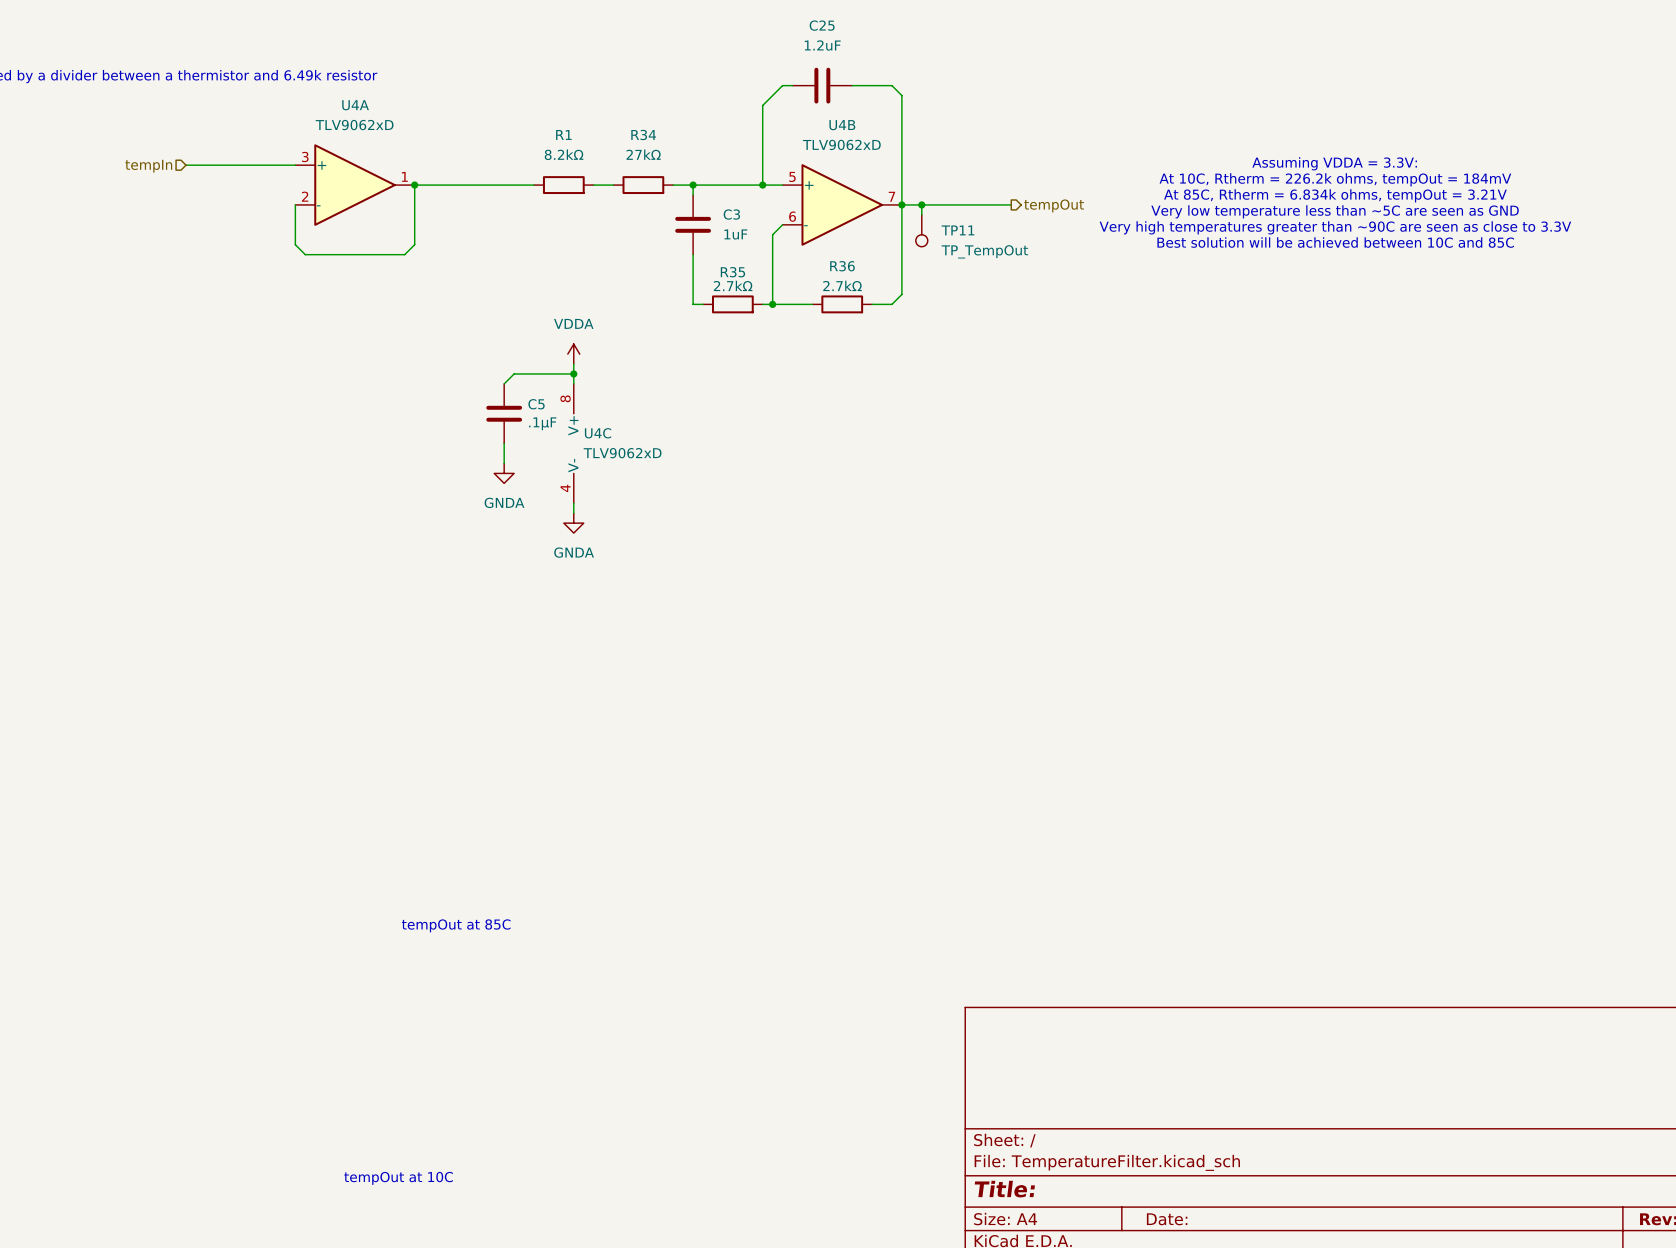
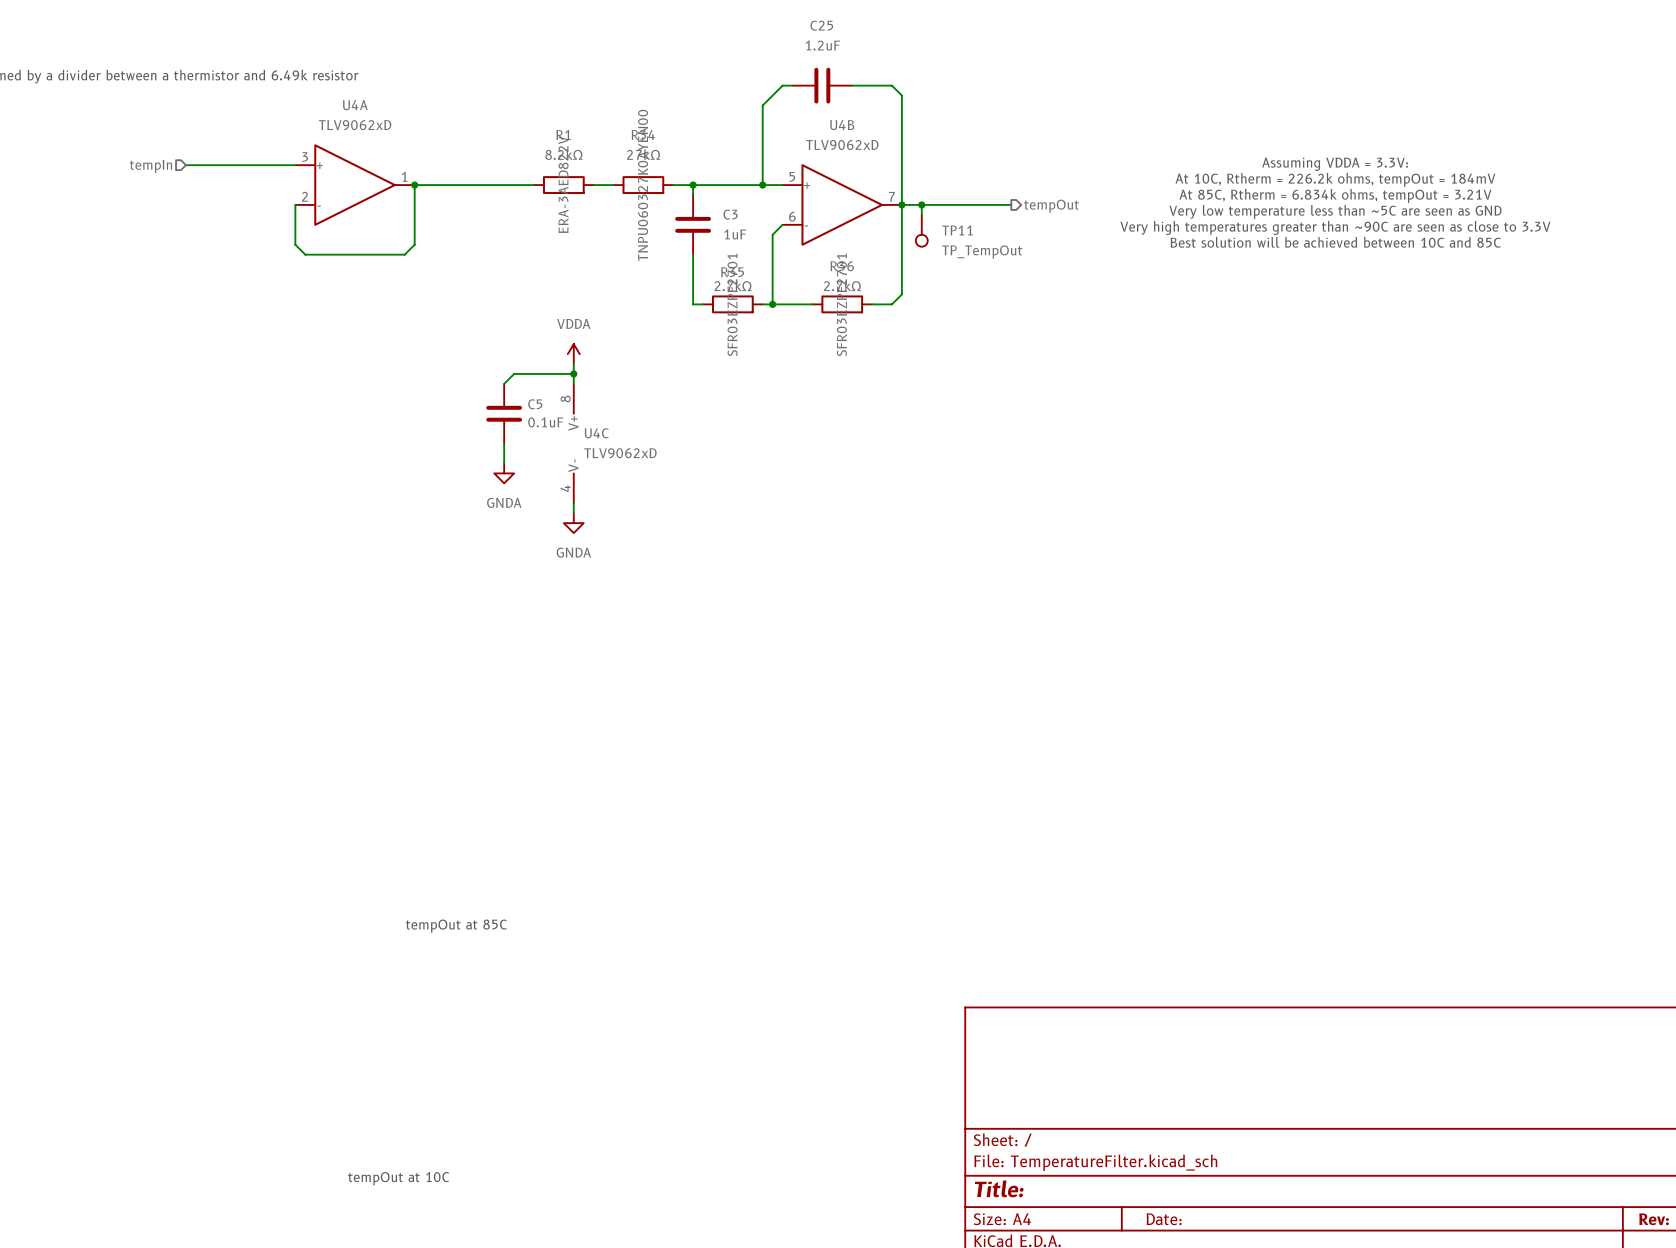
R1 text: none -> ERA-3AED822V (563, 184)
R34 text: none -> TNPU060327K0AYEN00 (643, 185)
R35 text: none -> SFR03EZPF2701 (732, 304)
R36 text: none -> SFR03EZPF2701 (841, 304)
C5 value: .1μF (542, 423) -> 0.1uF (545, 422)

